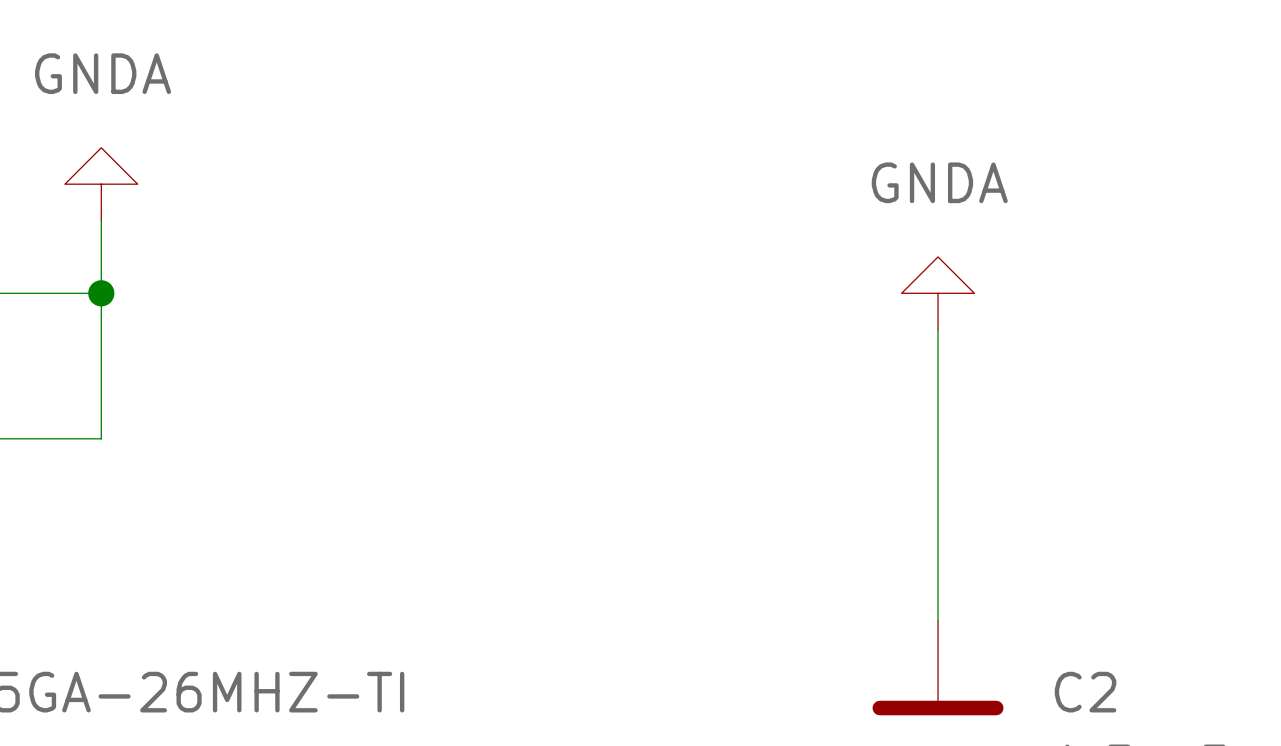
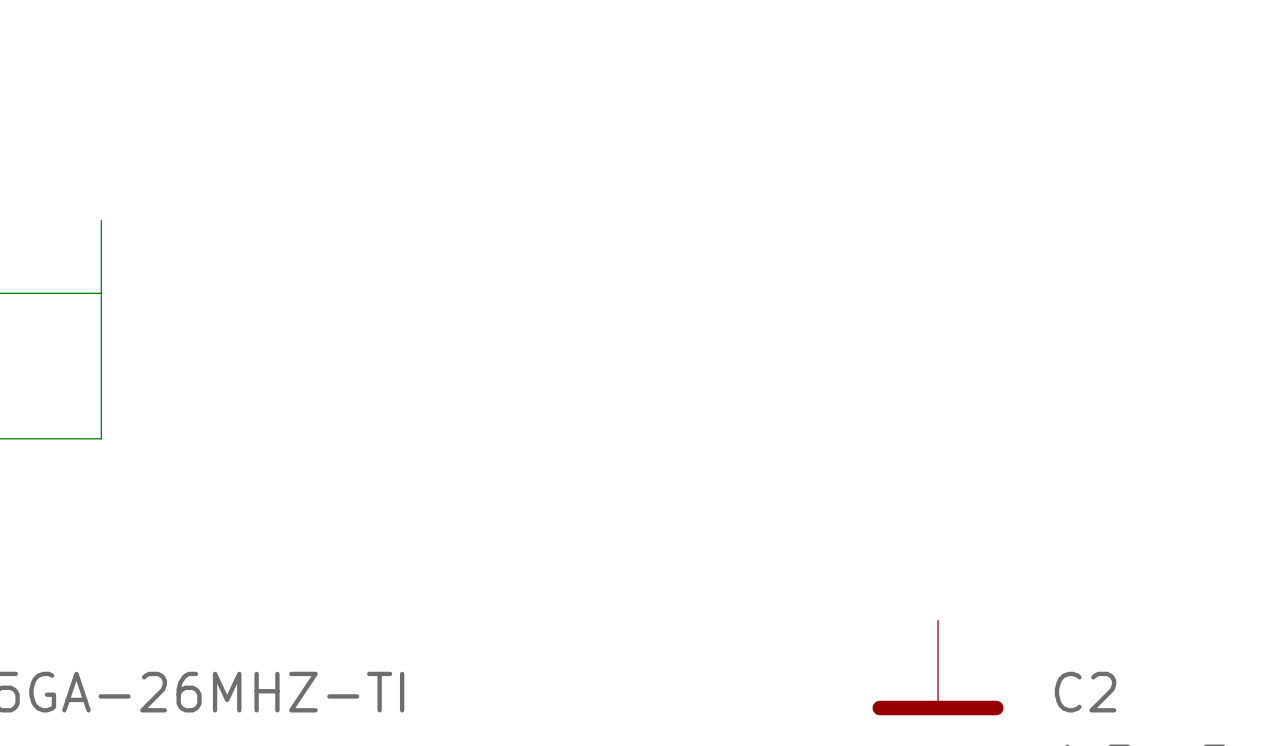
power symbol: GNDA (101, 184) -> none
junction: (101, 293) -> none
power symbol: GNDA (938, 293) -> none
wire: (938, 329) (938, 620) -> none

